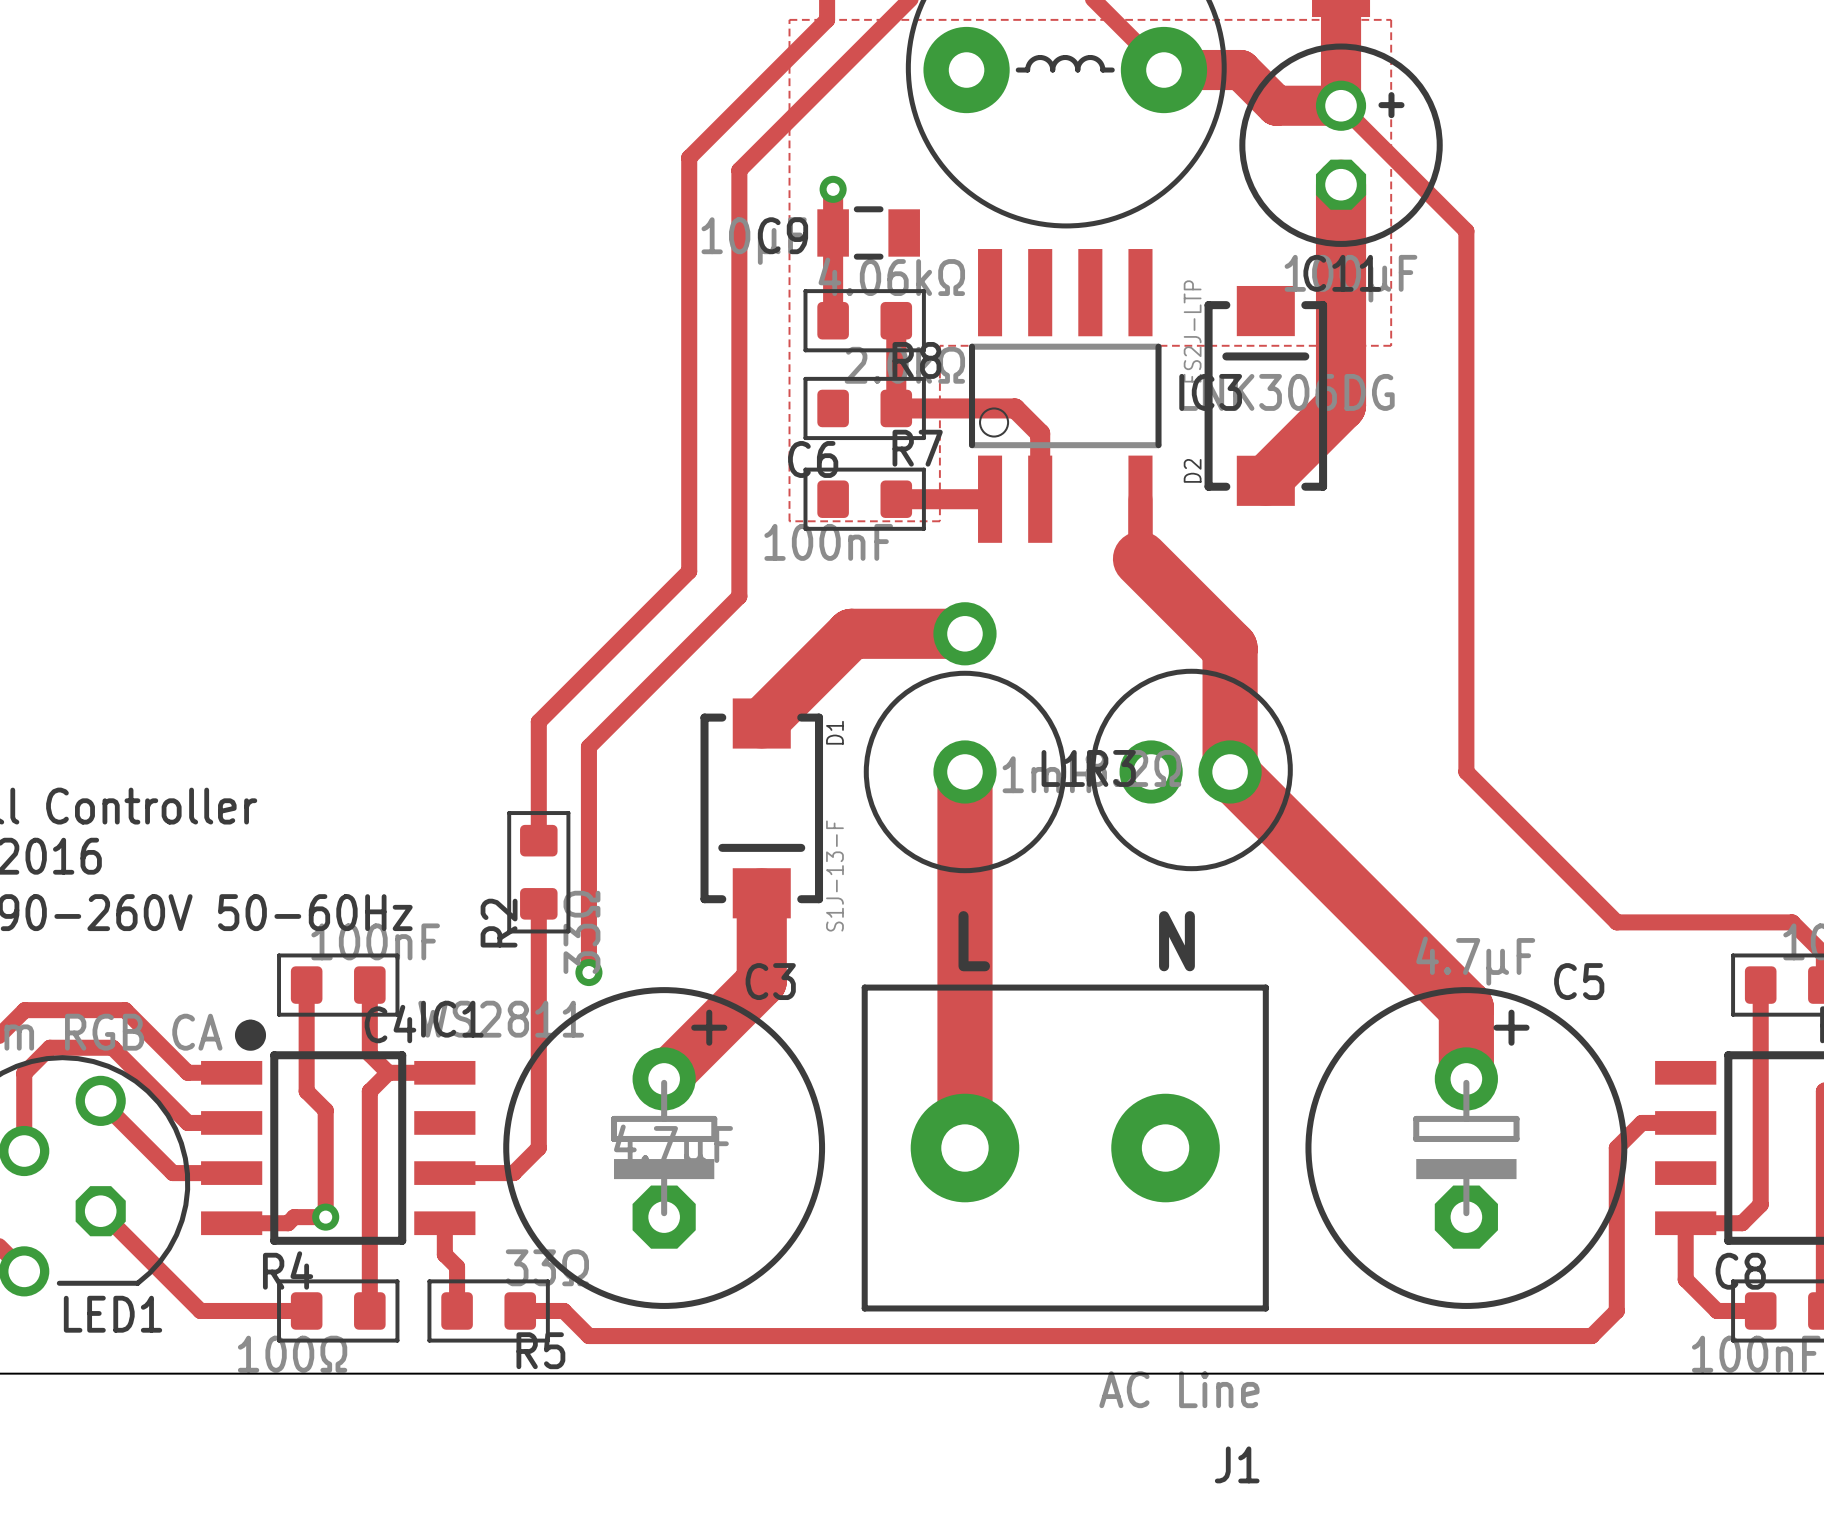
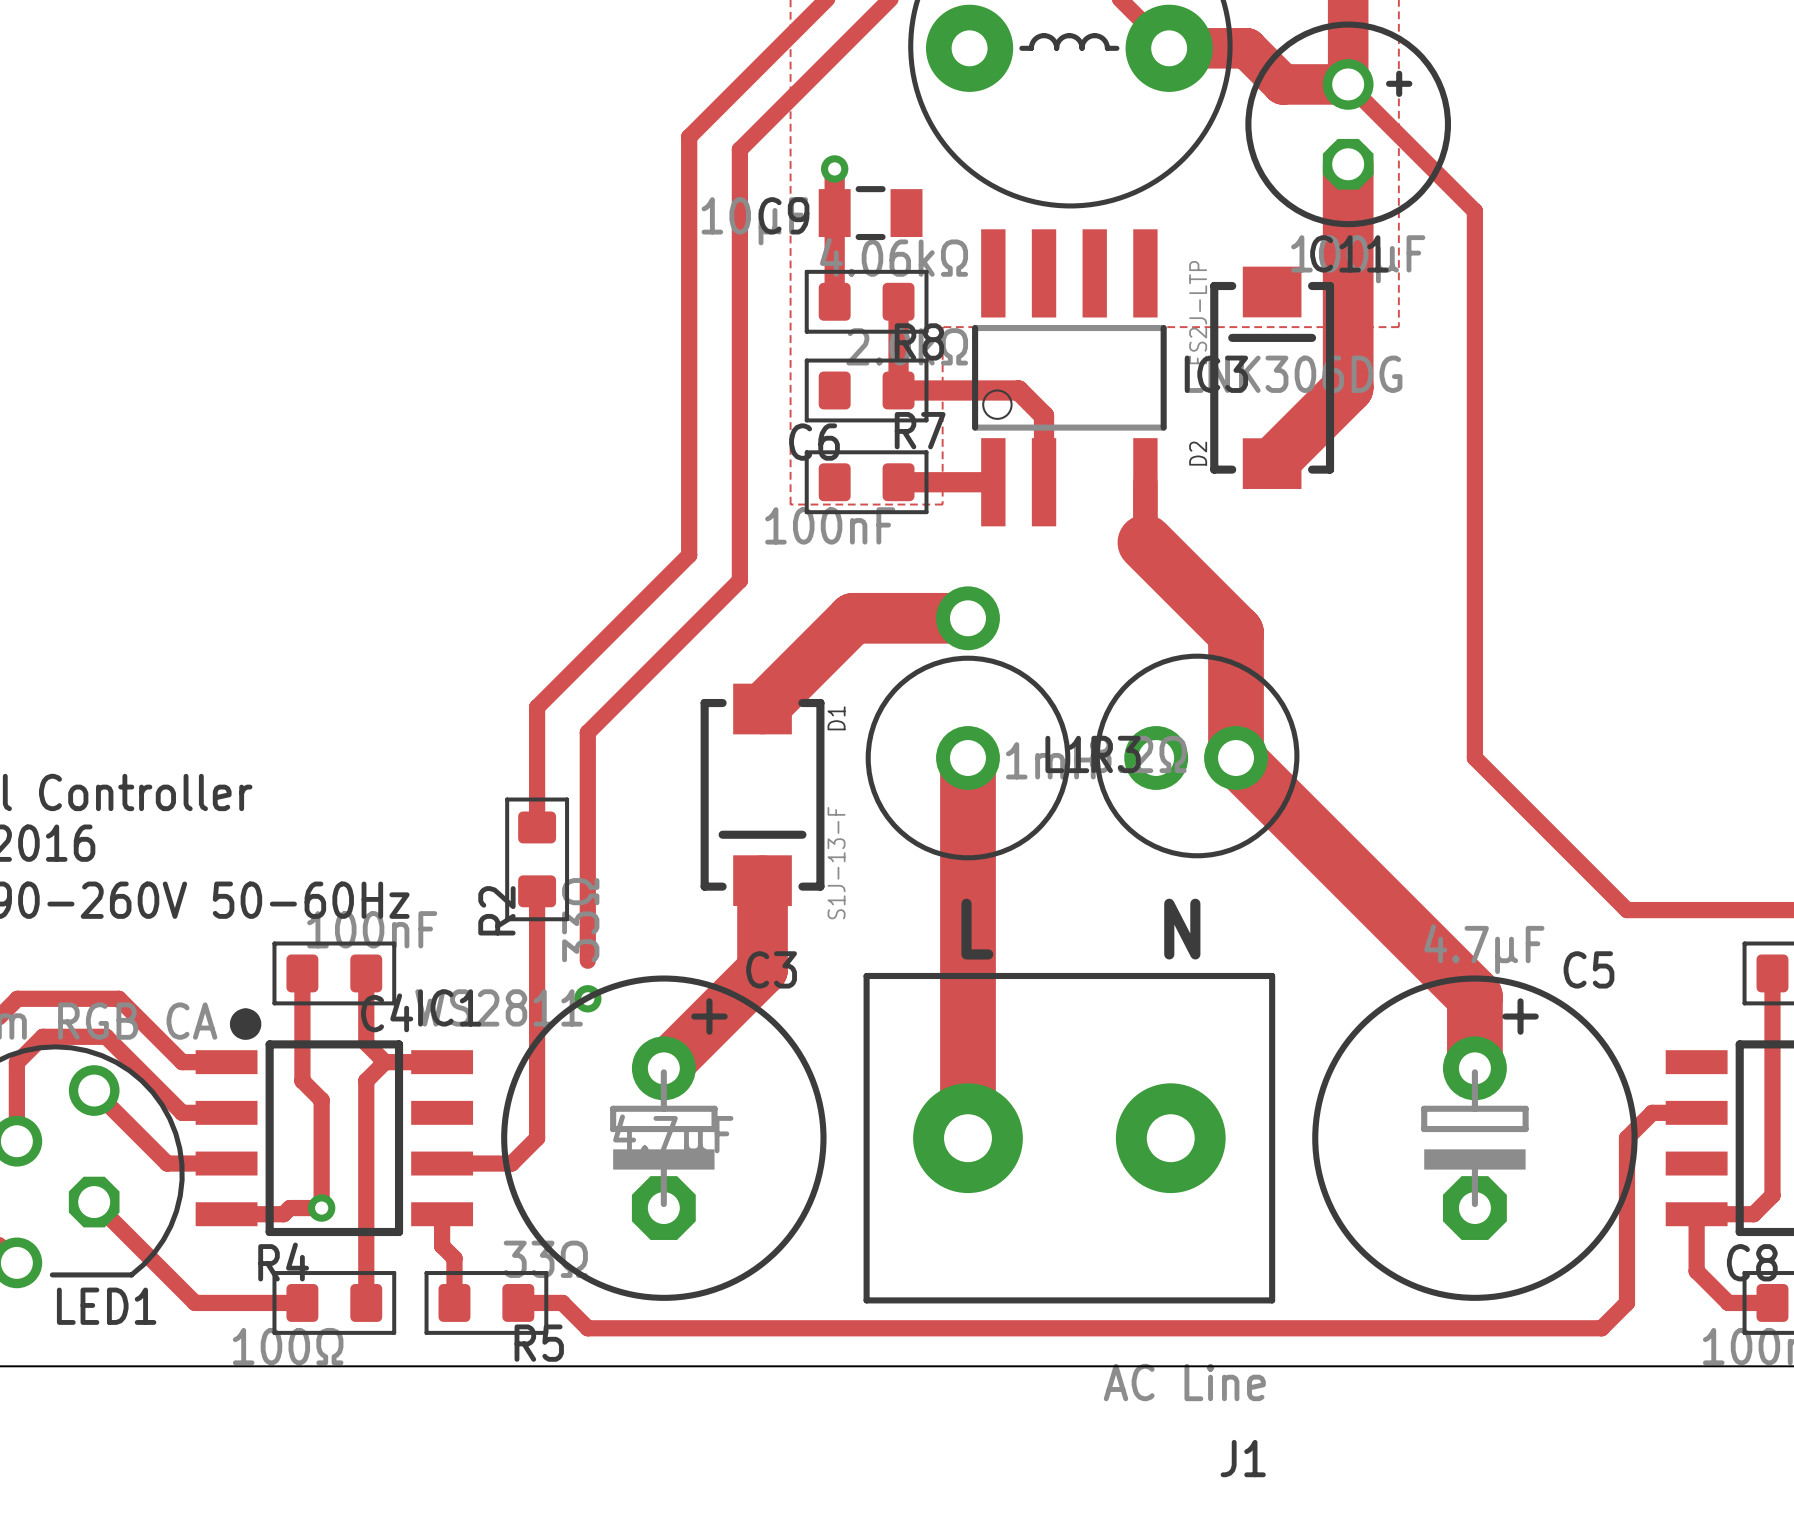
via position: (588, 972) -> (587, 998)

